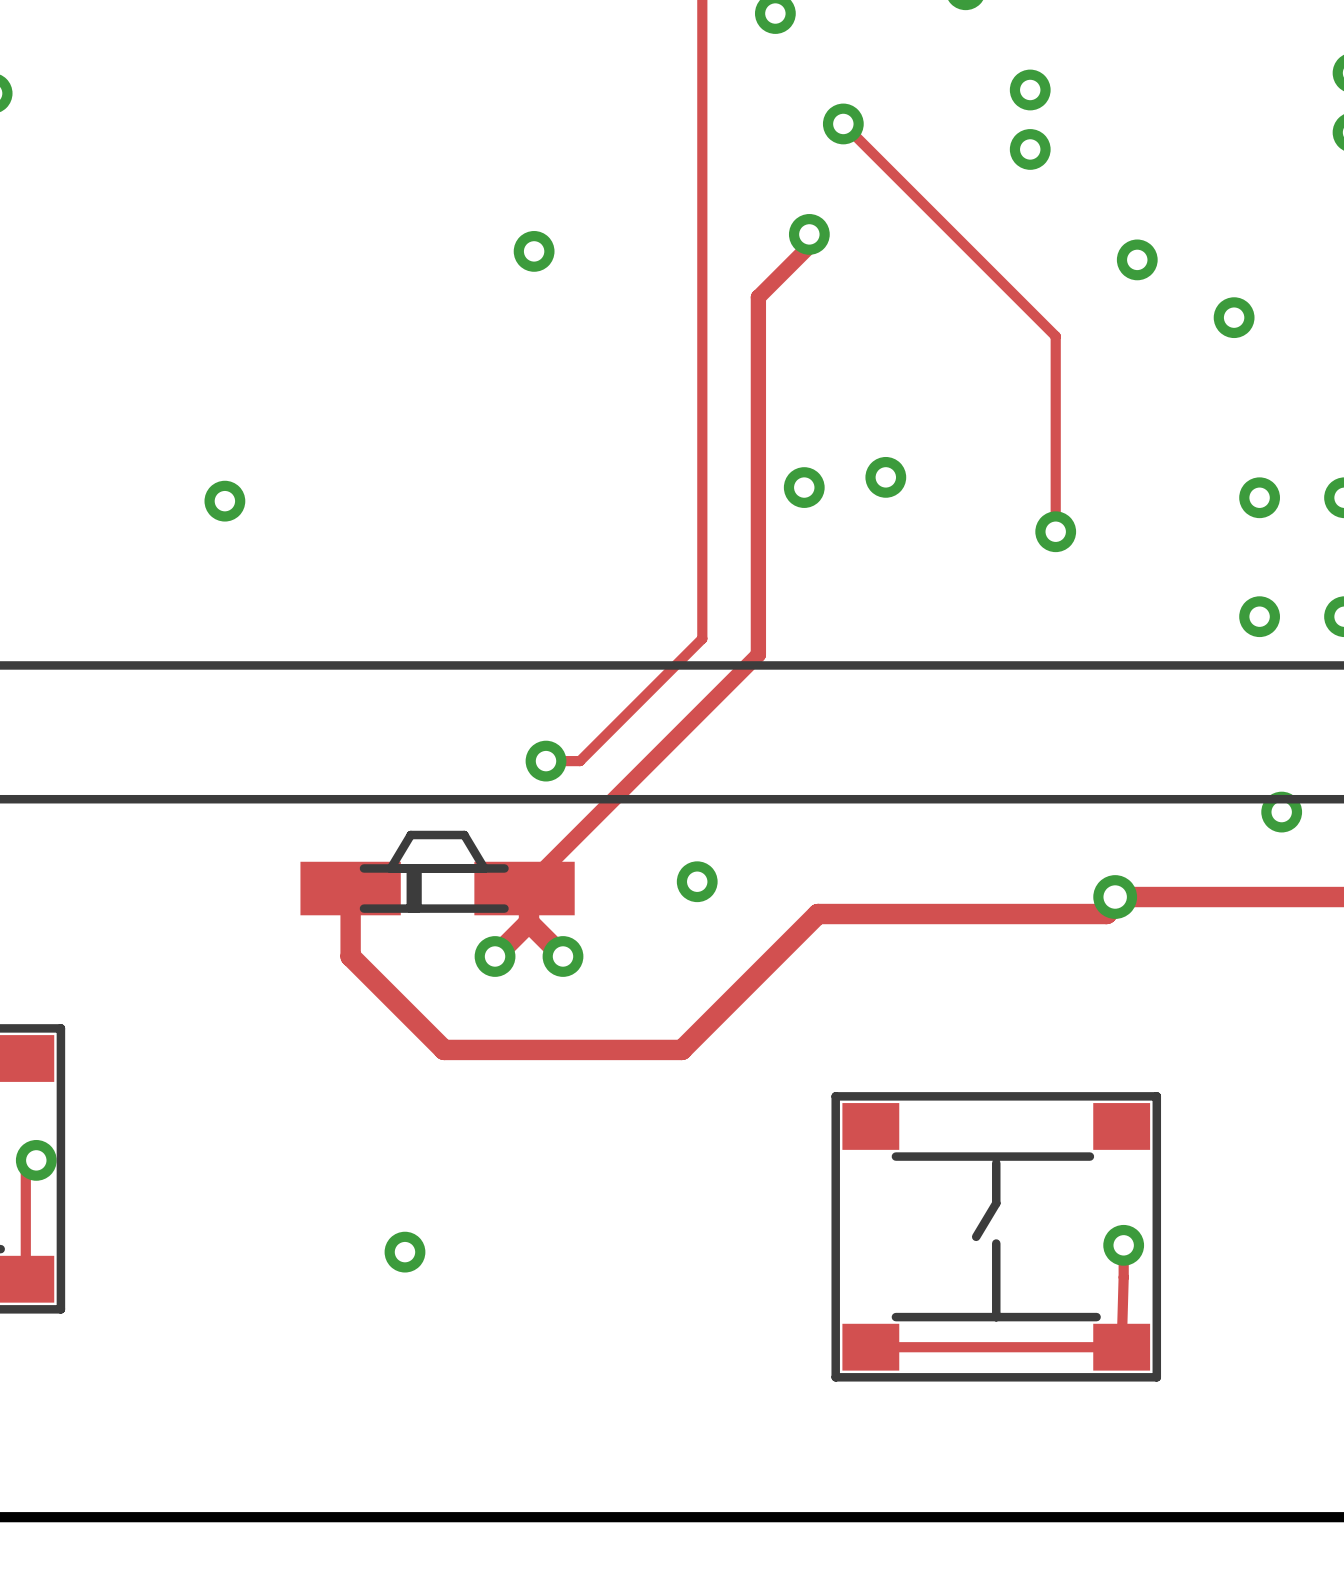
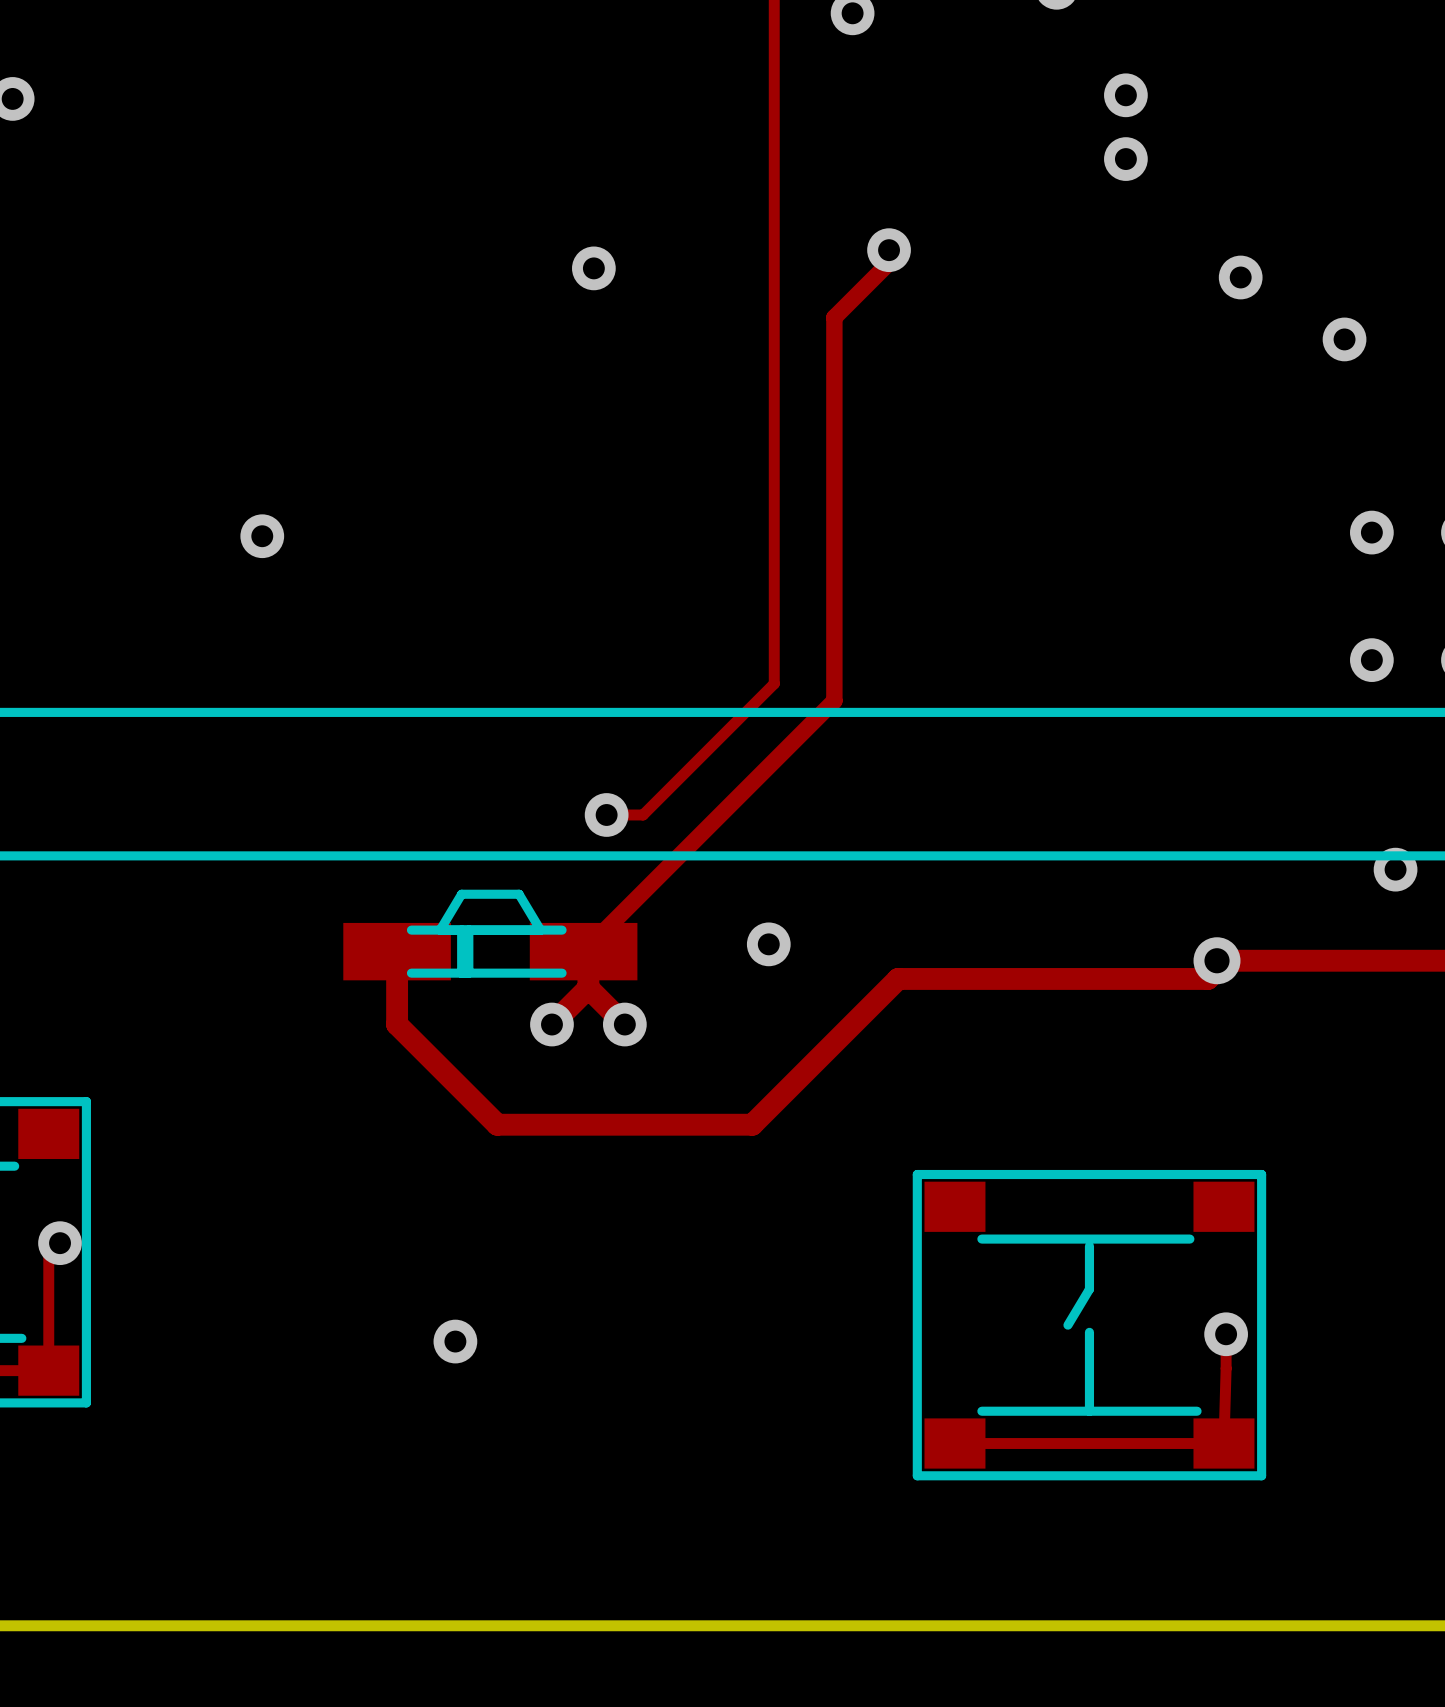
track: (843, 123) (1055, 336) (1055, 531) -> none
via: (843, 123) -> none
via: (885, 477) -> none
via: (804, 487) -> none
via: (1055, 531) -> none

